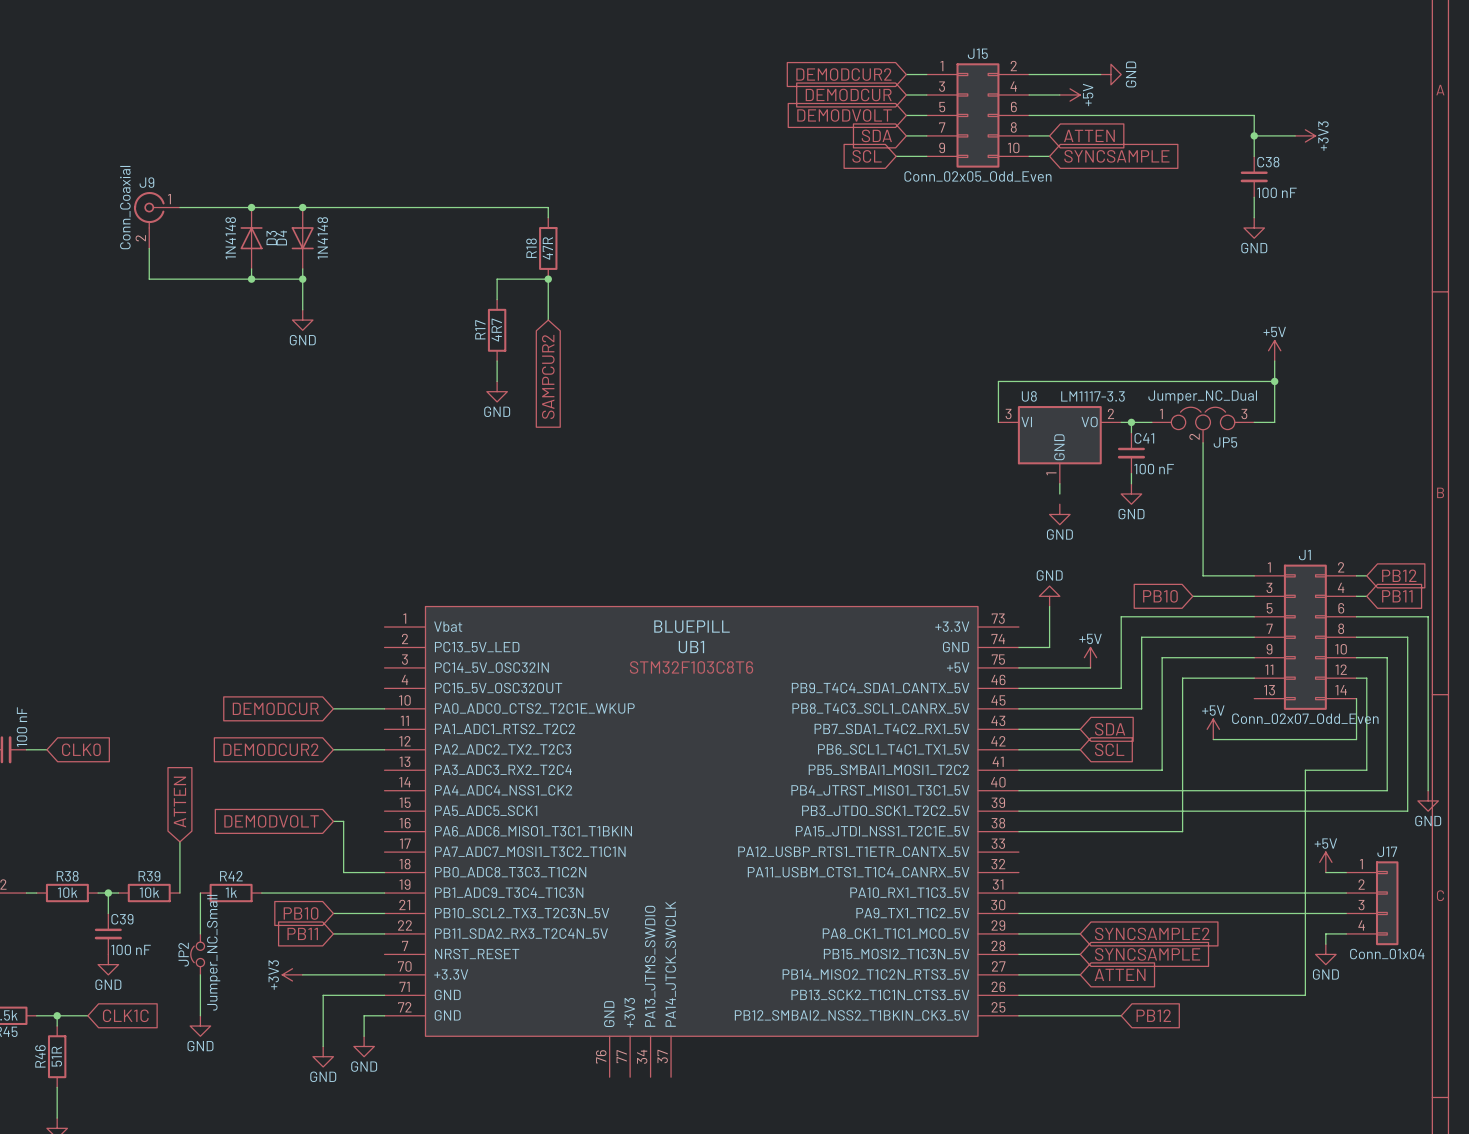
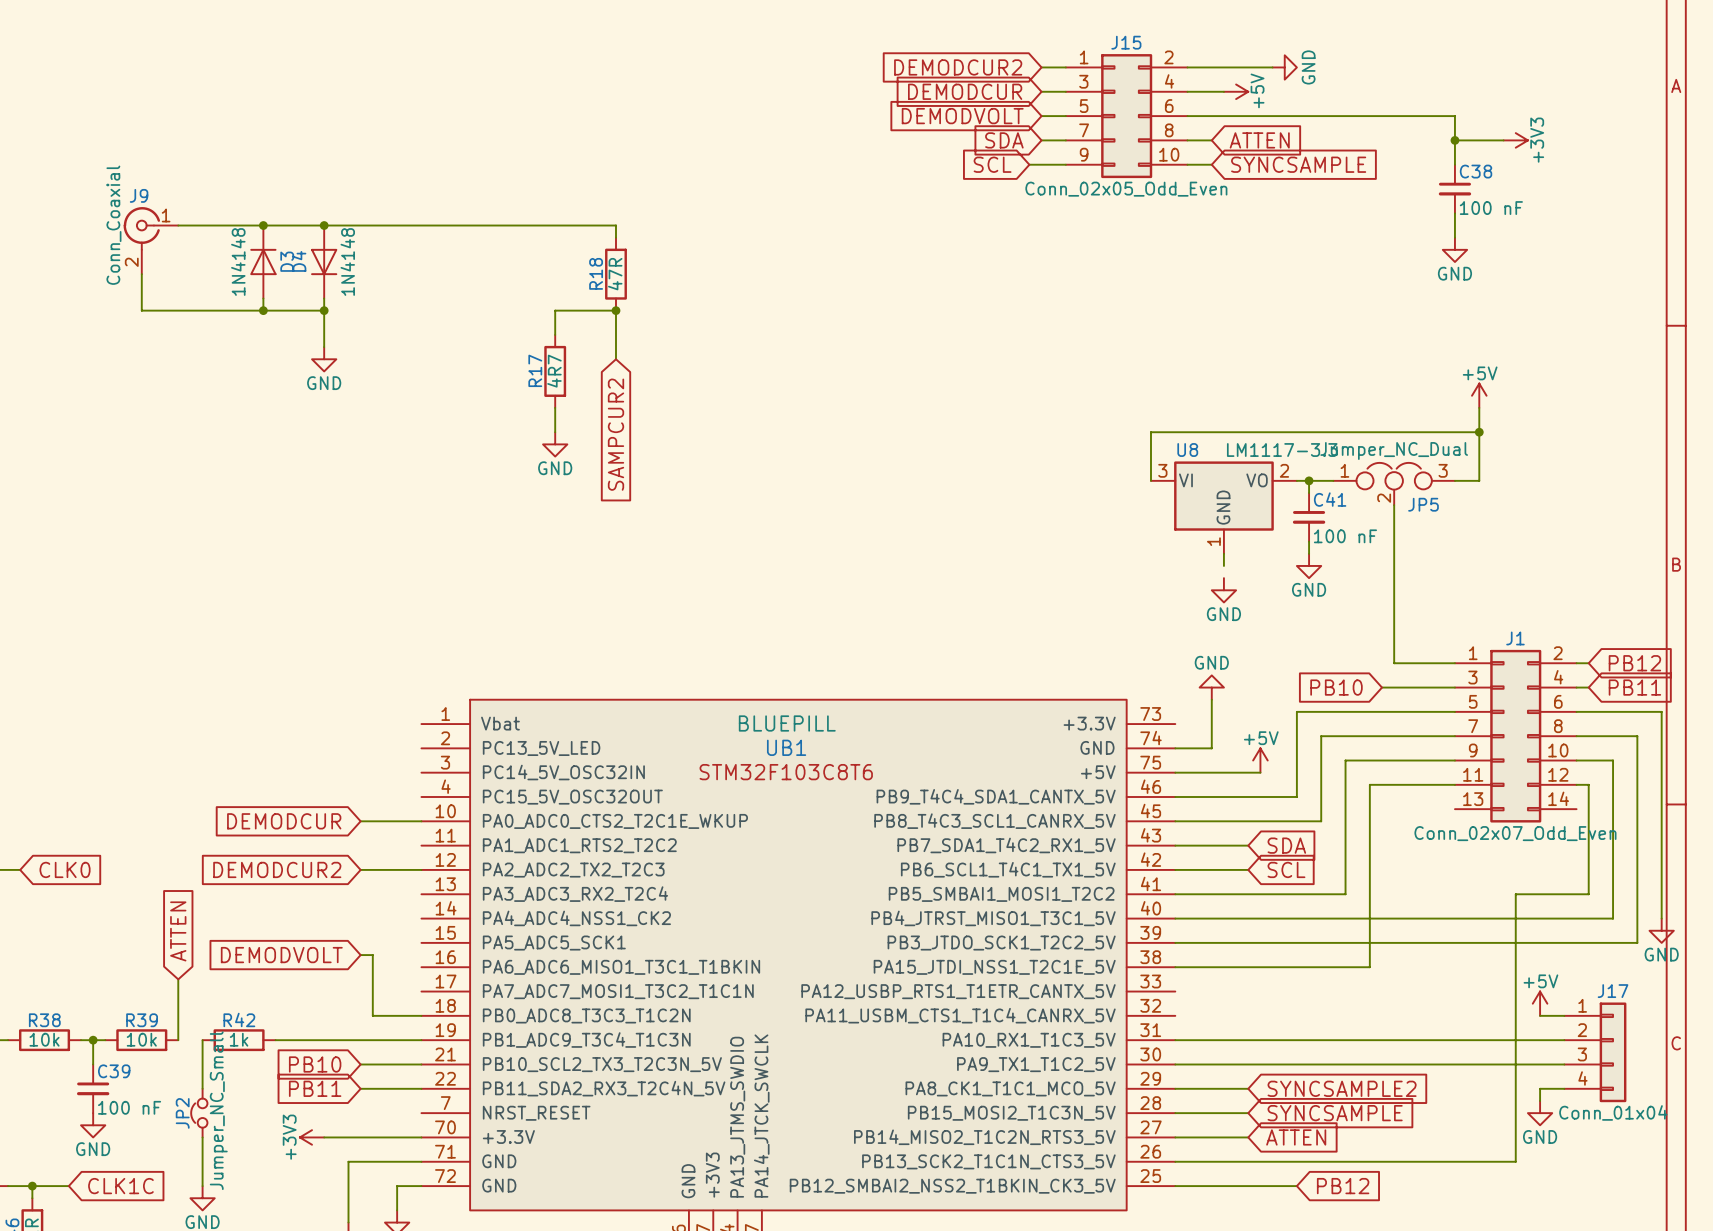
wire: (1356, 698) (1356, 739) (1213, 739) -> none
power symbol: +5V (1213, 729) -> none

